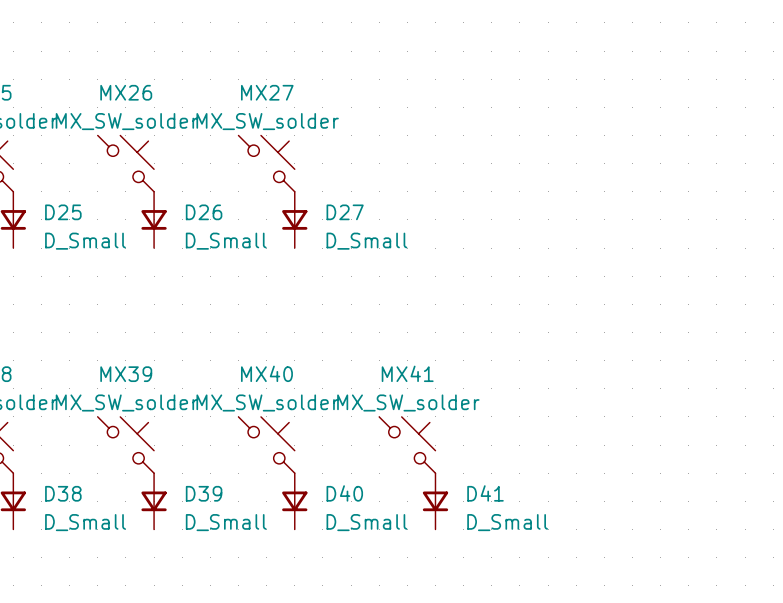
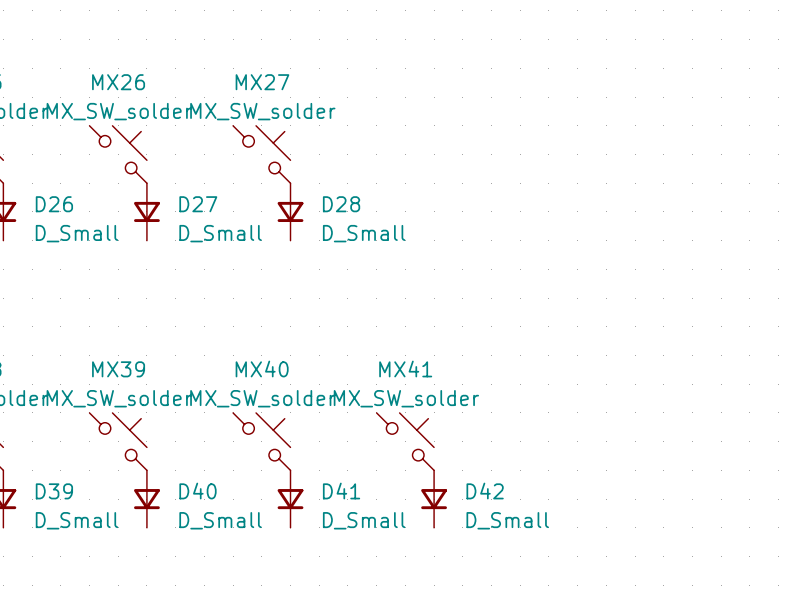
D25 name: D25 (63, 212) -> D26 (54, 204)
D26 name: D26 (204, 212) -> D27 (198, 204)
D27 name: D27 (345, 212) -> D28 (341, 204)
D38 name: D38 (63, 493) -> D39 (54, 491)
D39 name: D39 (204, 493) -> D40 (197, 491)
D40 name: D40 (344, 493) -> D41 (341, 491)
D41 name: D41 (485, 493) -> D42 (485, 491)

